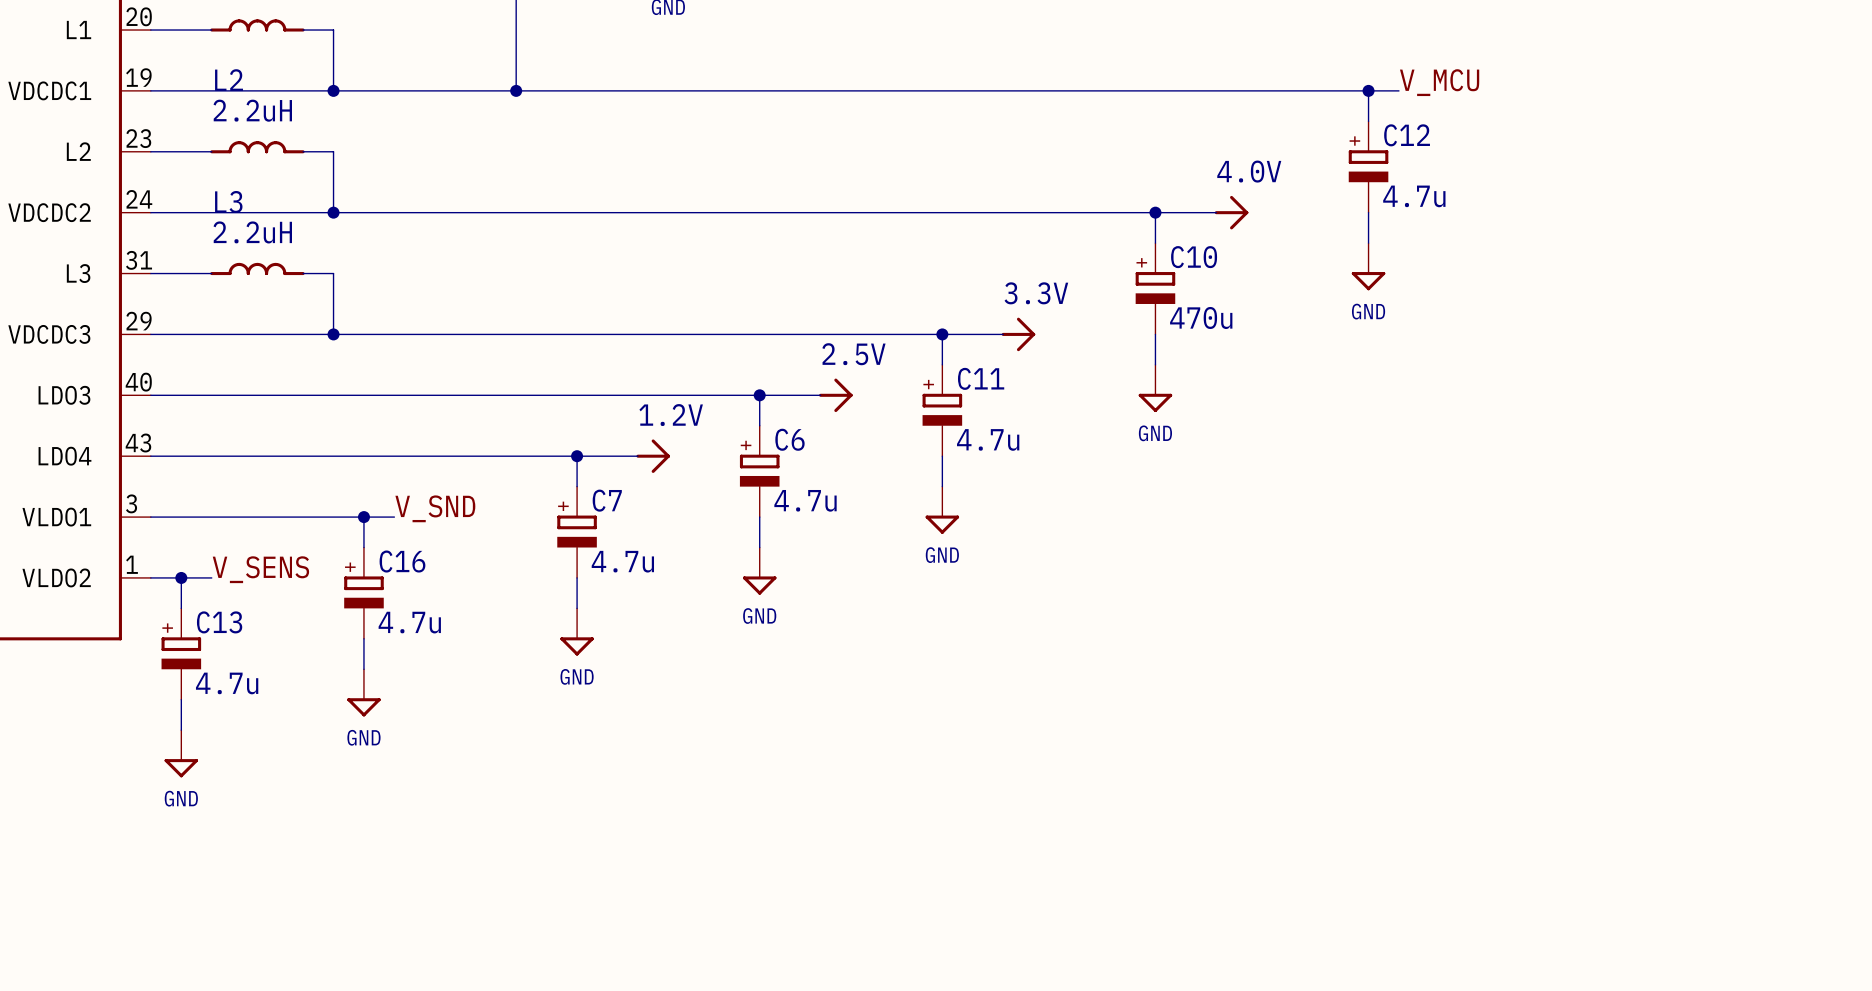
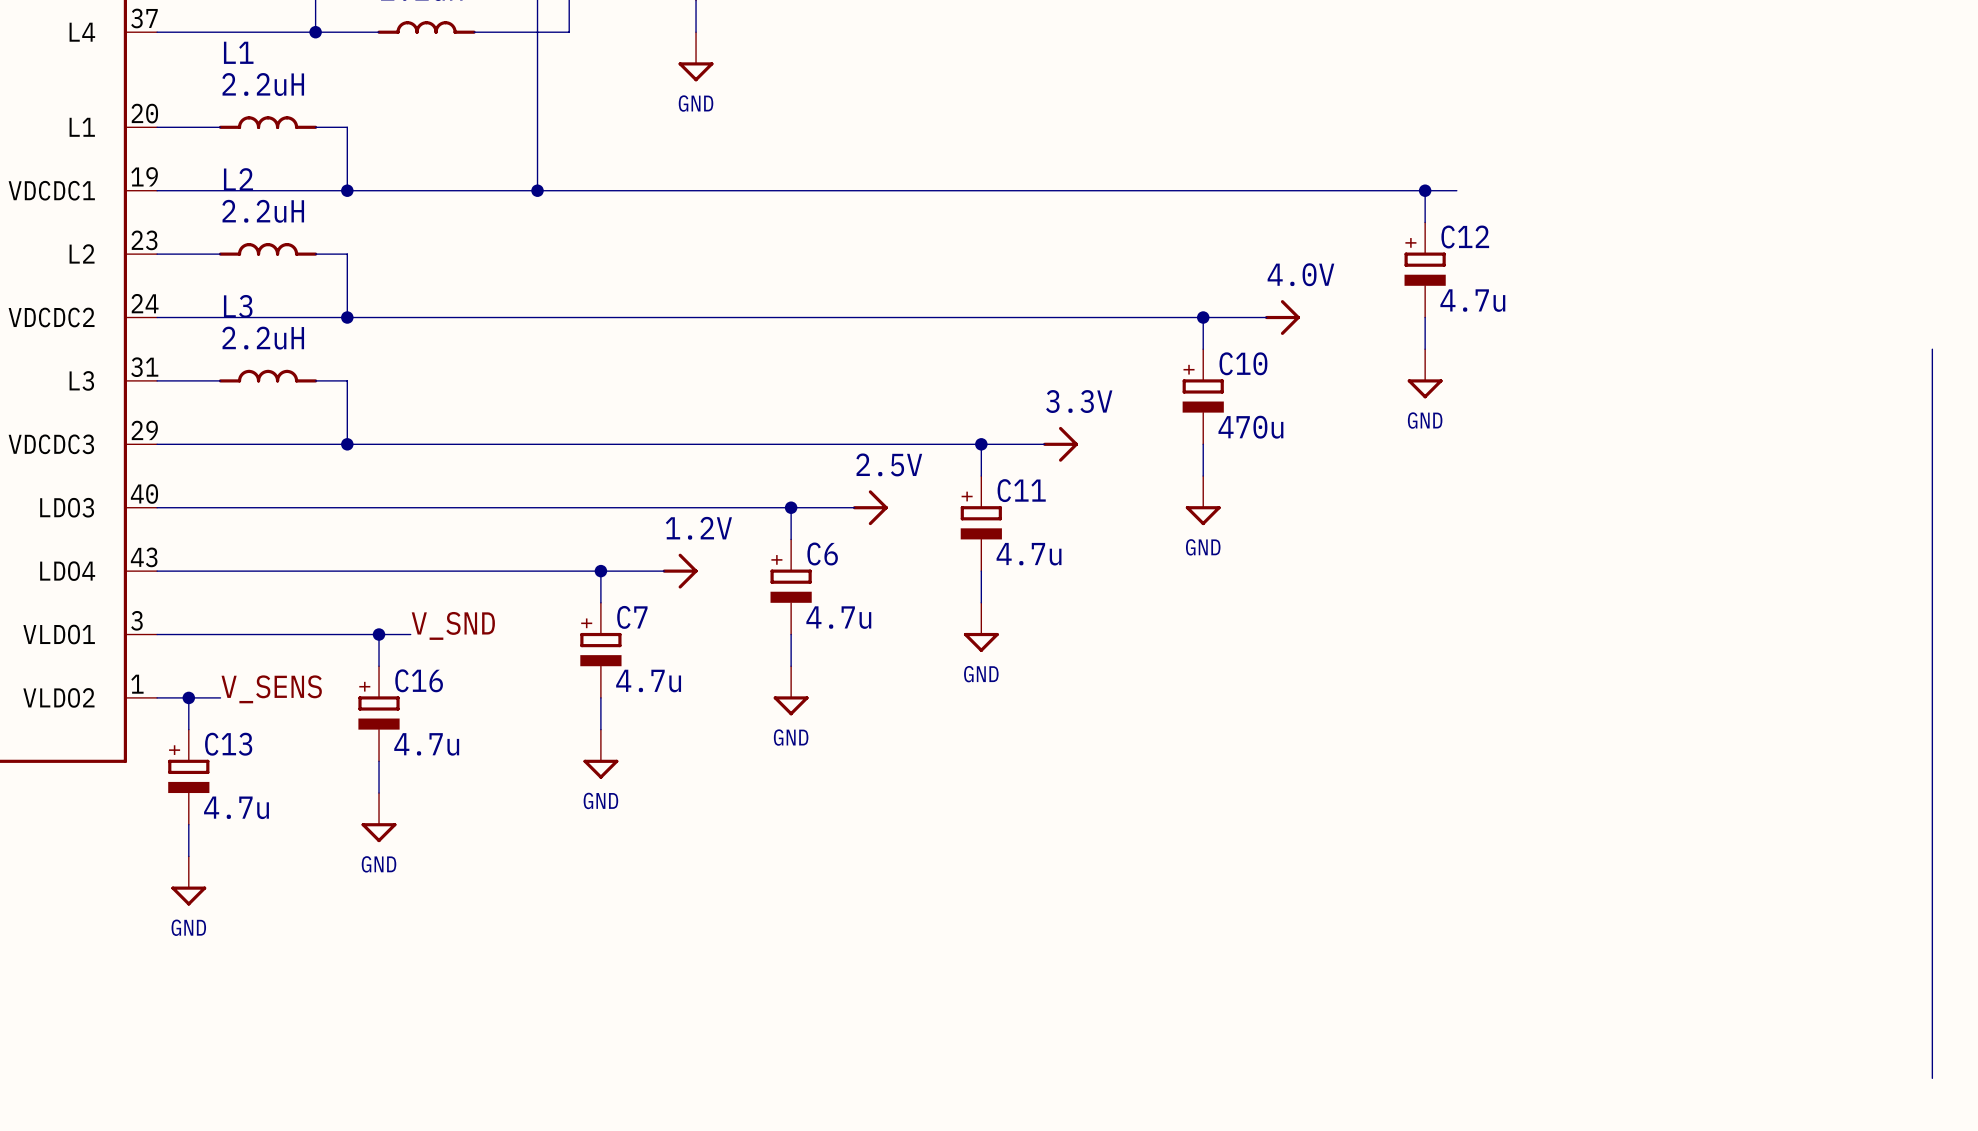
label: V_MCU (1439, 82) -> none
bus: none -> (1932, 349) (1932, 1078)

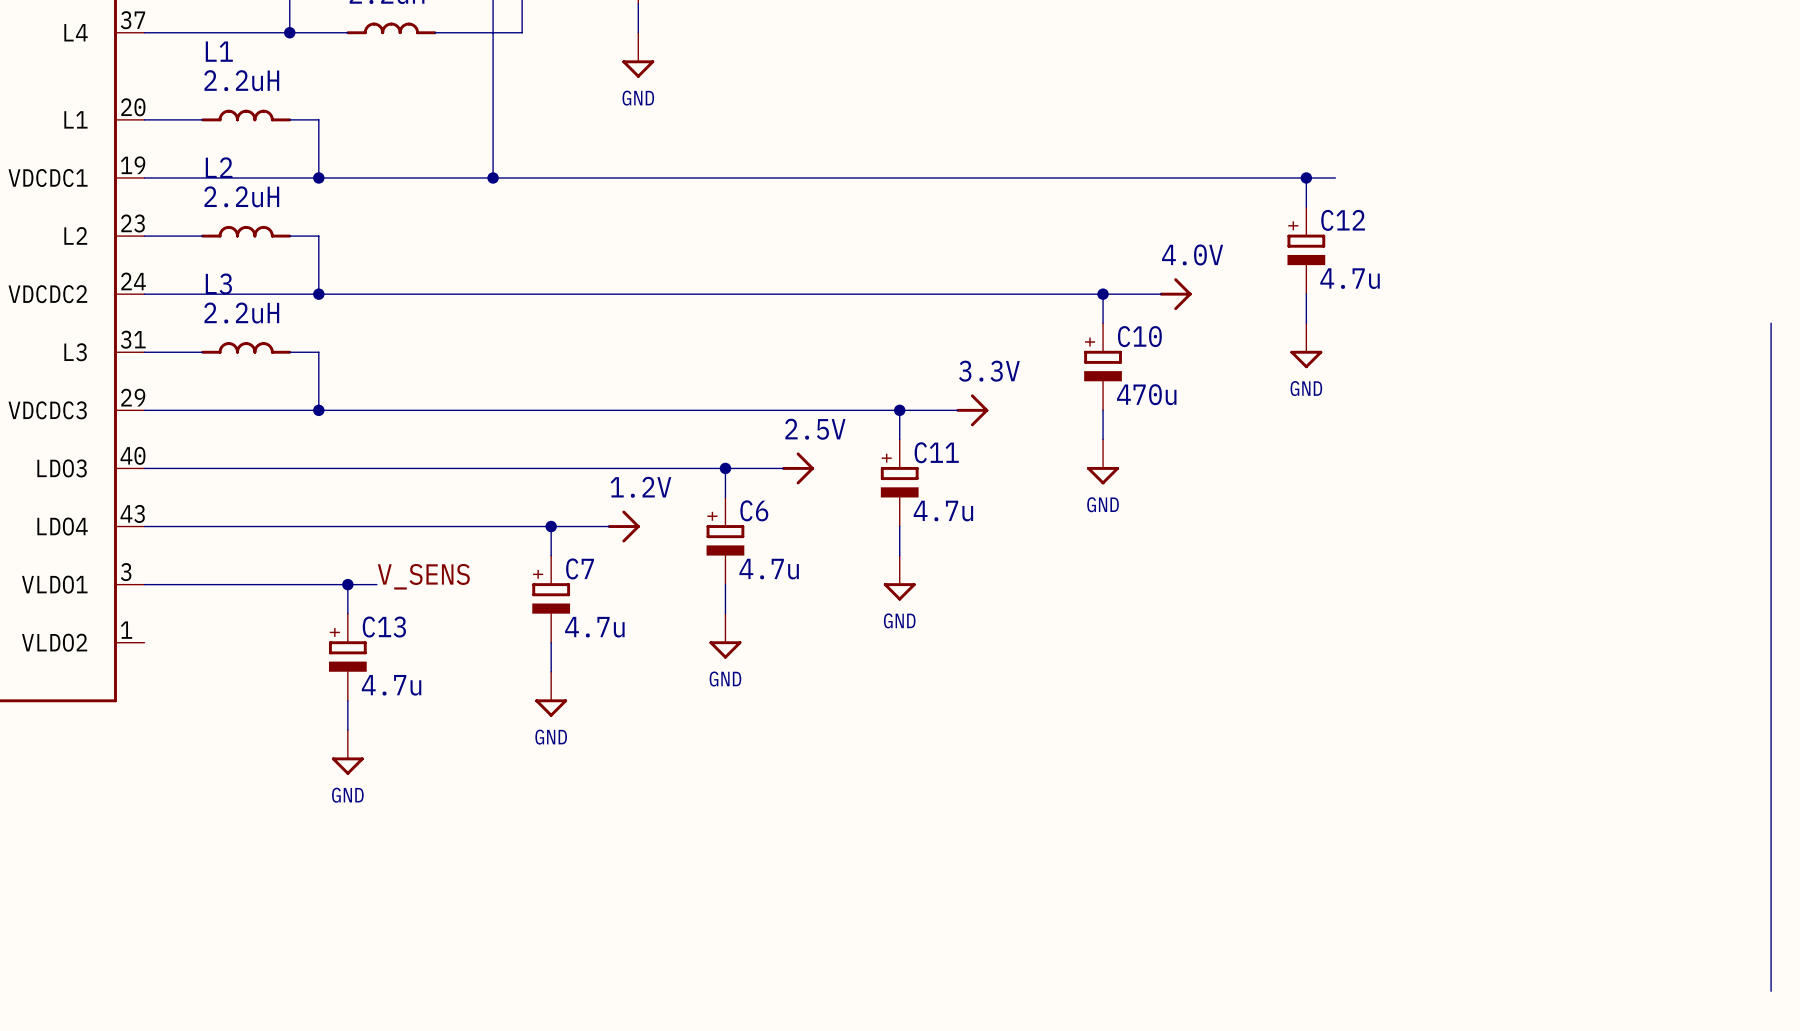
label: V_SND (453, 625) -> V_SENS (423, 576)
C16 name: C16 (419, 680) -> C13 (384, 627)
label: V_SENS (271, 689) -> none
wire: (157, 697) (220, 697) -> none
wire: (188, 697) (188, 729) -> none
junction: (188, 697) -> none
C13: 4.7u (188, 777) -> none
wire: (188, 824) (188, 856) -> none
power symbol: GND (188, 881) -> none

